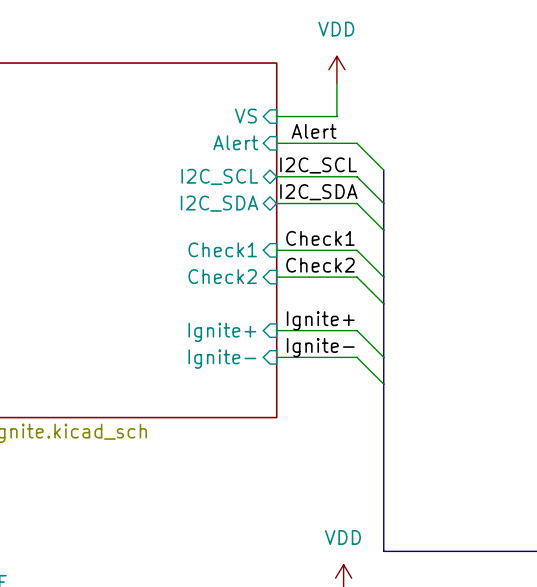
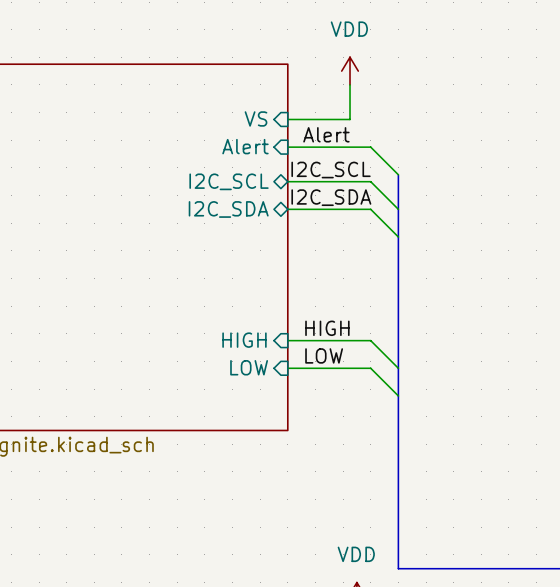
label: Check1 (320, 238) -> none
sheet pin: Check1 (222, 249) -> none
wire: (276, 250) (356, 250) (383, 277) -> none
label: Check2 (320, 265) -> none
sheet pin: Check2 (222, 276) -> none
wire: (276, 277) (356, 277) (383, 303) -> none
label: Ignite+ (320, 320) -> HIGH (327, 328)
sheet pin: Ignite+ (222, 332) -> HIGH (244, 340)
label: Ignite- (320, 347) -> LOW (324, 355)
sheet pin: Ignite- (222, 359) -> LOW (249, 367)

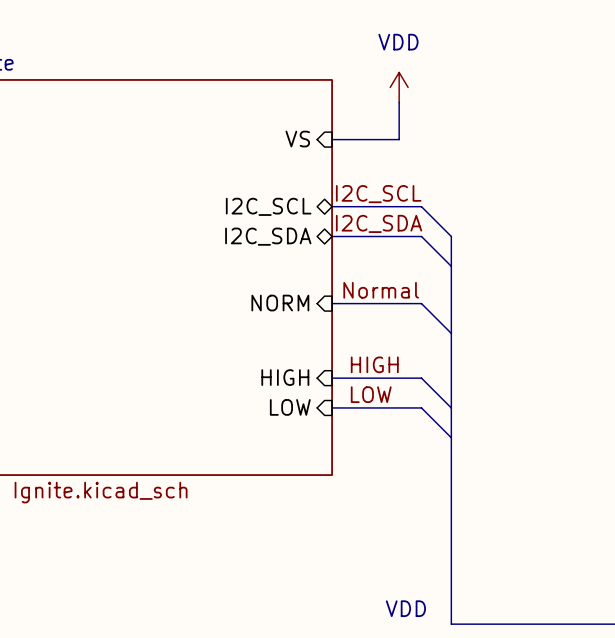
label: Alert (326, 134) -> none
sheet pin: Alert (245, 146) -> none
wire: (287, 147) (370, 147) (398, 174) -> (332, 303) (421, 303) (451, 333)
bus: (398, 174) (398, 209) -> none
label: none -> Normal (381, 290)
sheet pin: none -> NORM (280, 303)

